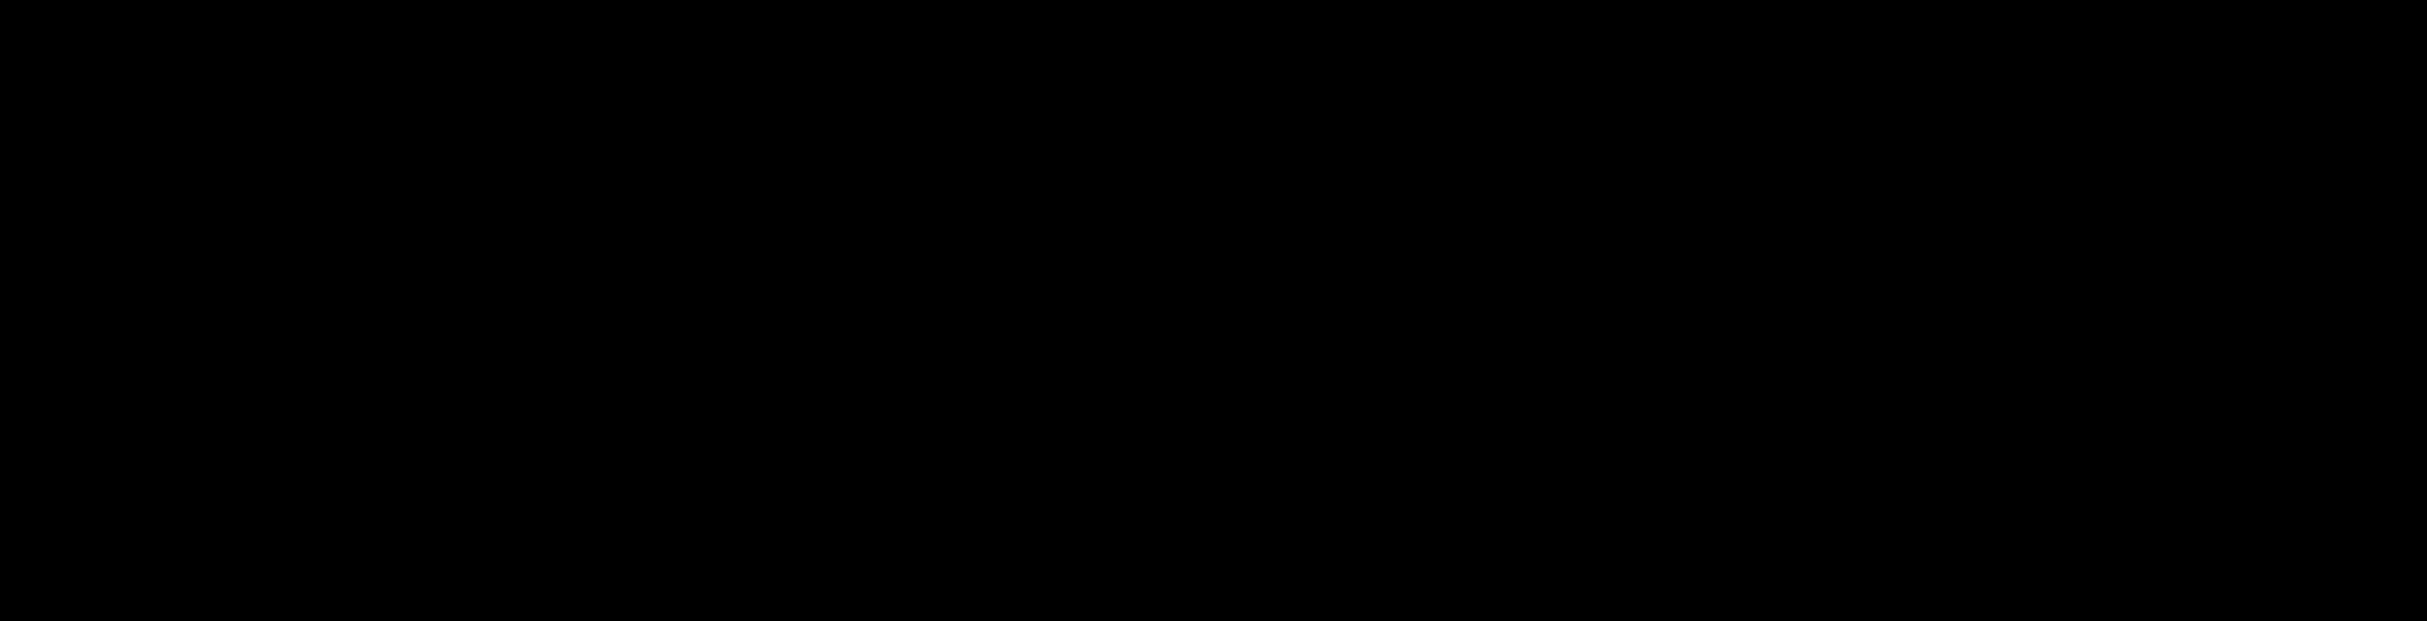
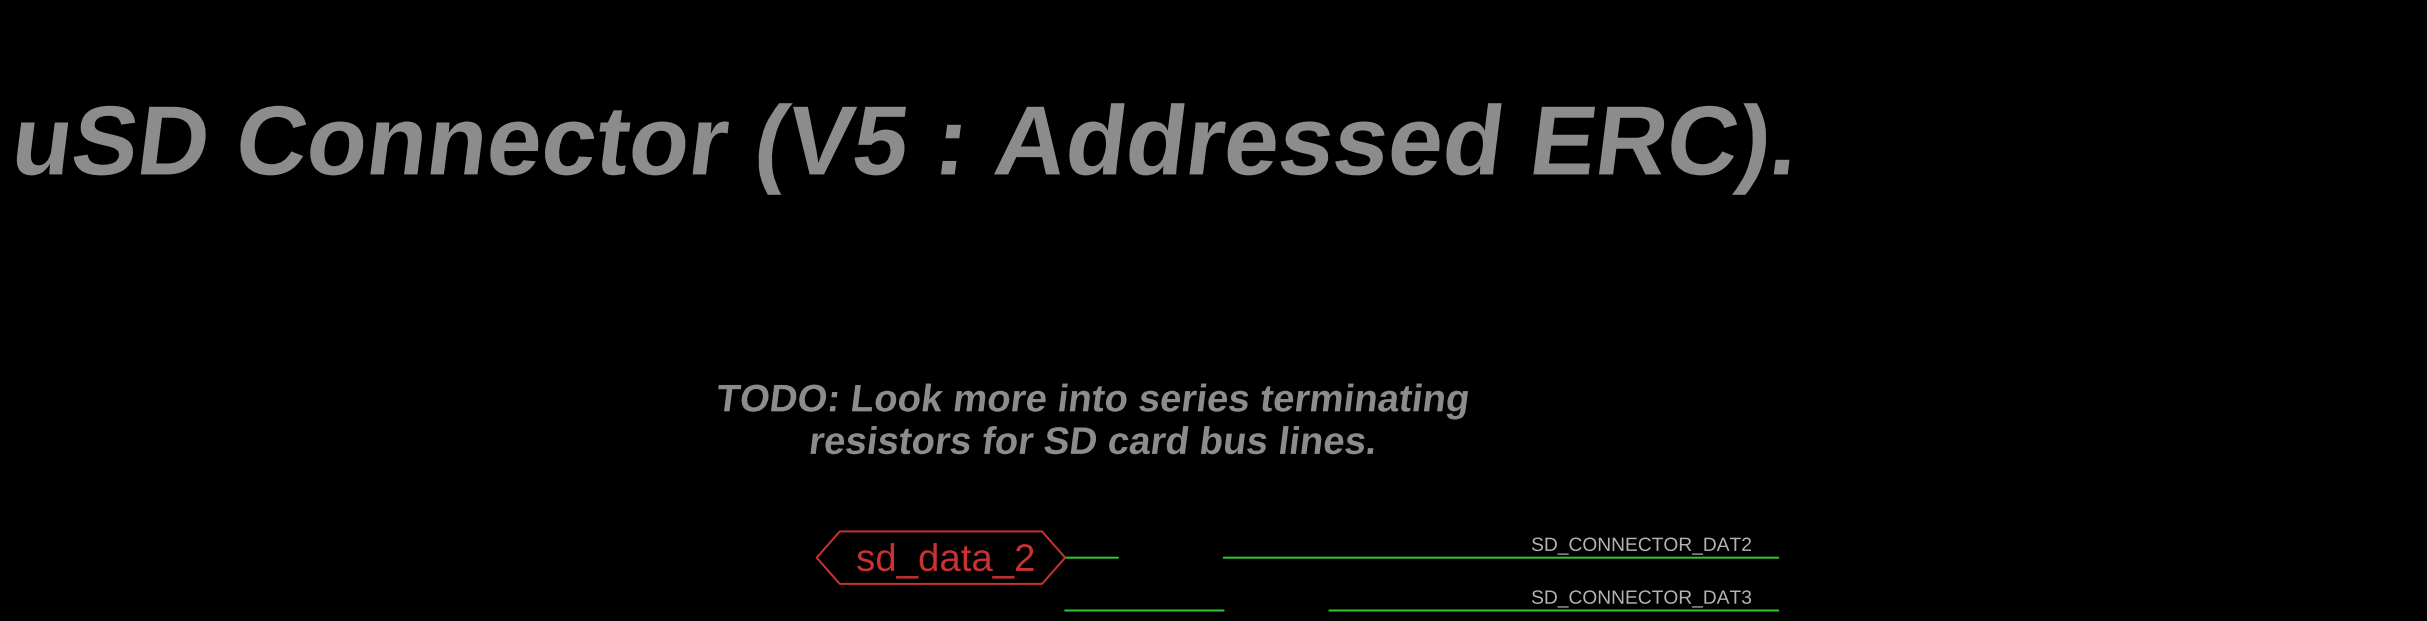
text: none -> uSD Connector (V5 : Addressed ERC). (902, 148)
text: none -> TODO: Look more into series terminating (1093, 401)
text: none -> resistors for SD card bus lines. (1091, 440)
label: none -> SD_CONNECTOR_DAT2 (1641, 546)
wire: none -> (1065, 557) (1117, 557)
wire: none -> (1223, 557) (1778, 557)
global label: none -> sd_data_2 (945, 560)
label: none -> SD_CONNECTOR_DAT3 (1641, 598)
wire: none -> (1065, 610) (1223, 610)
wire: none -> (1329, 610) (1778, 610)

